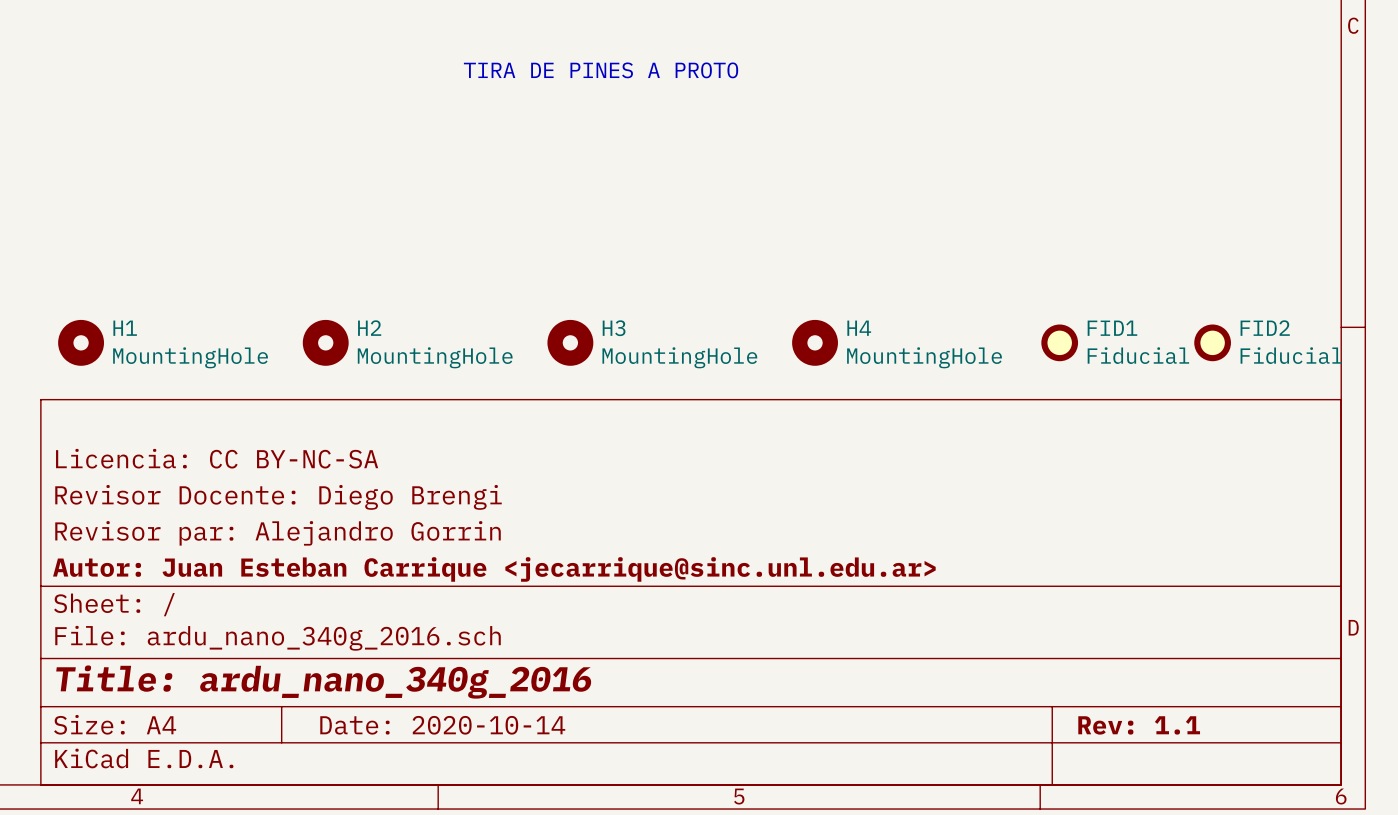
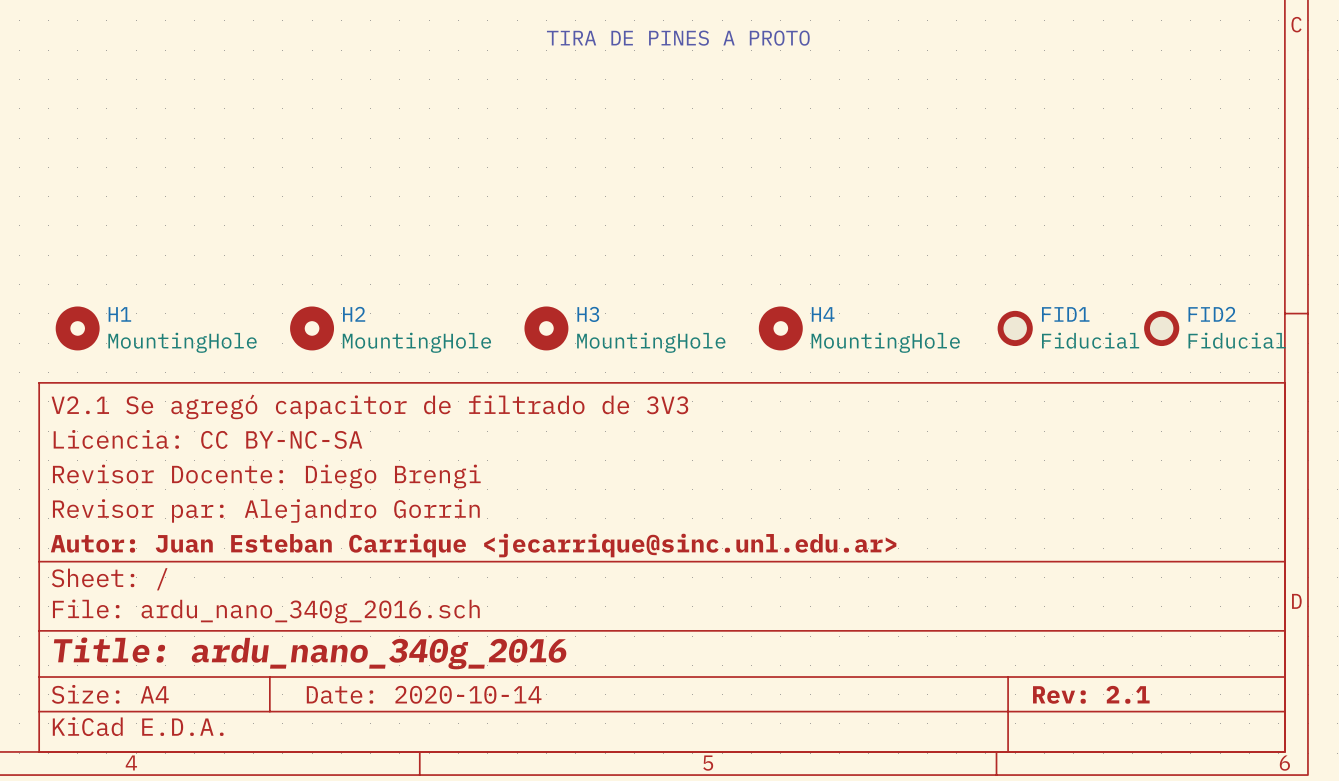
text position: TIRA DE PINES A PROTO (601, 70) -> TIRA DE PINES A PROTO (678, 38)
title block: none -> V2.1 Se agregó capacitor de filtrado de 3V3 (369, 406)
title block: Rev: 1.1 (1139, 725) -> Rev: 2.1 (1091, 694)

